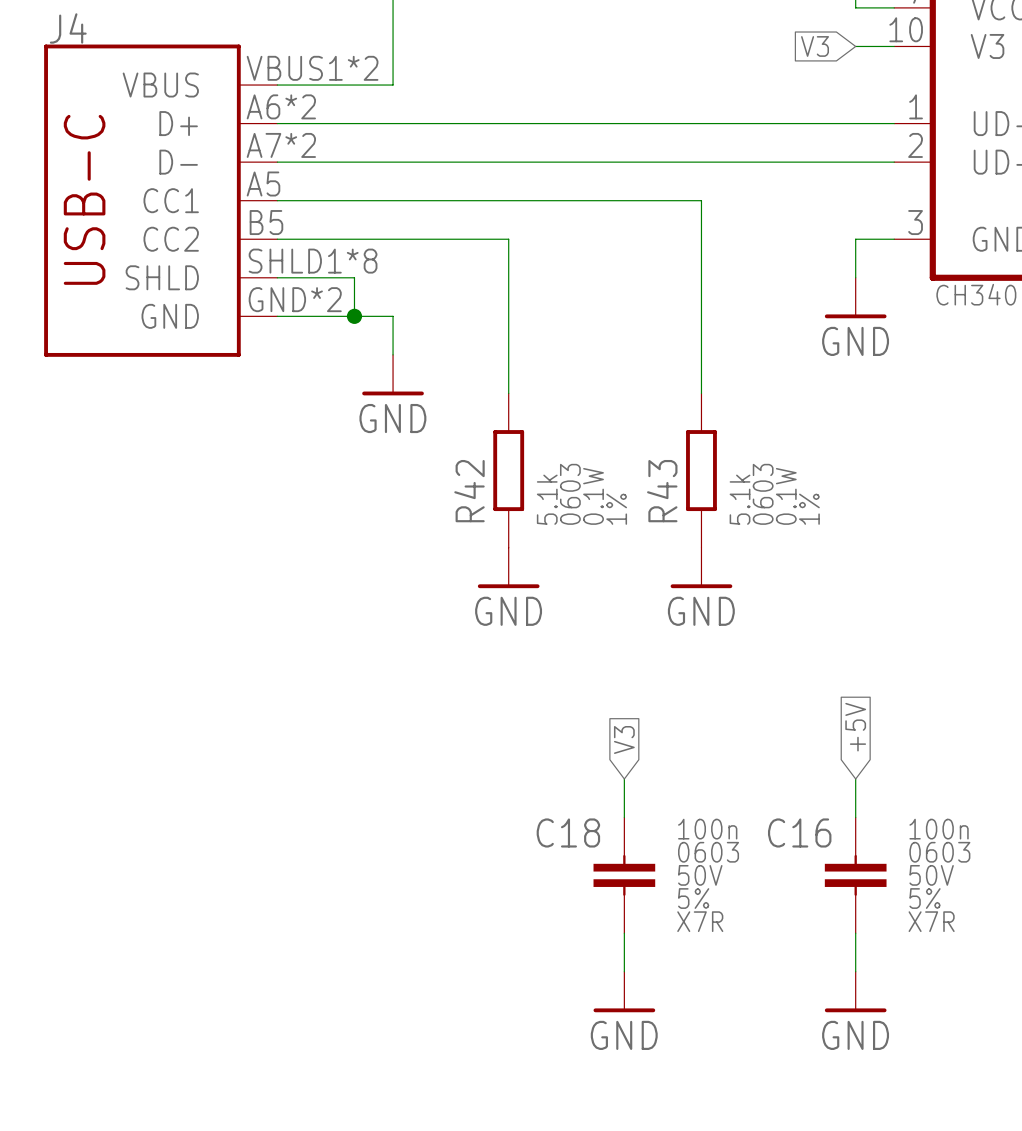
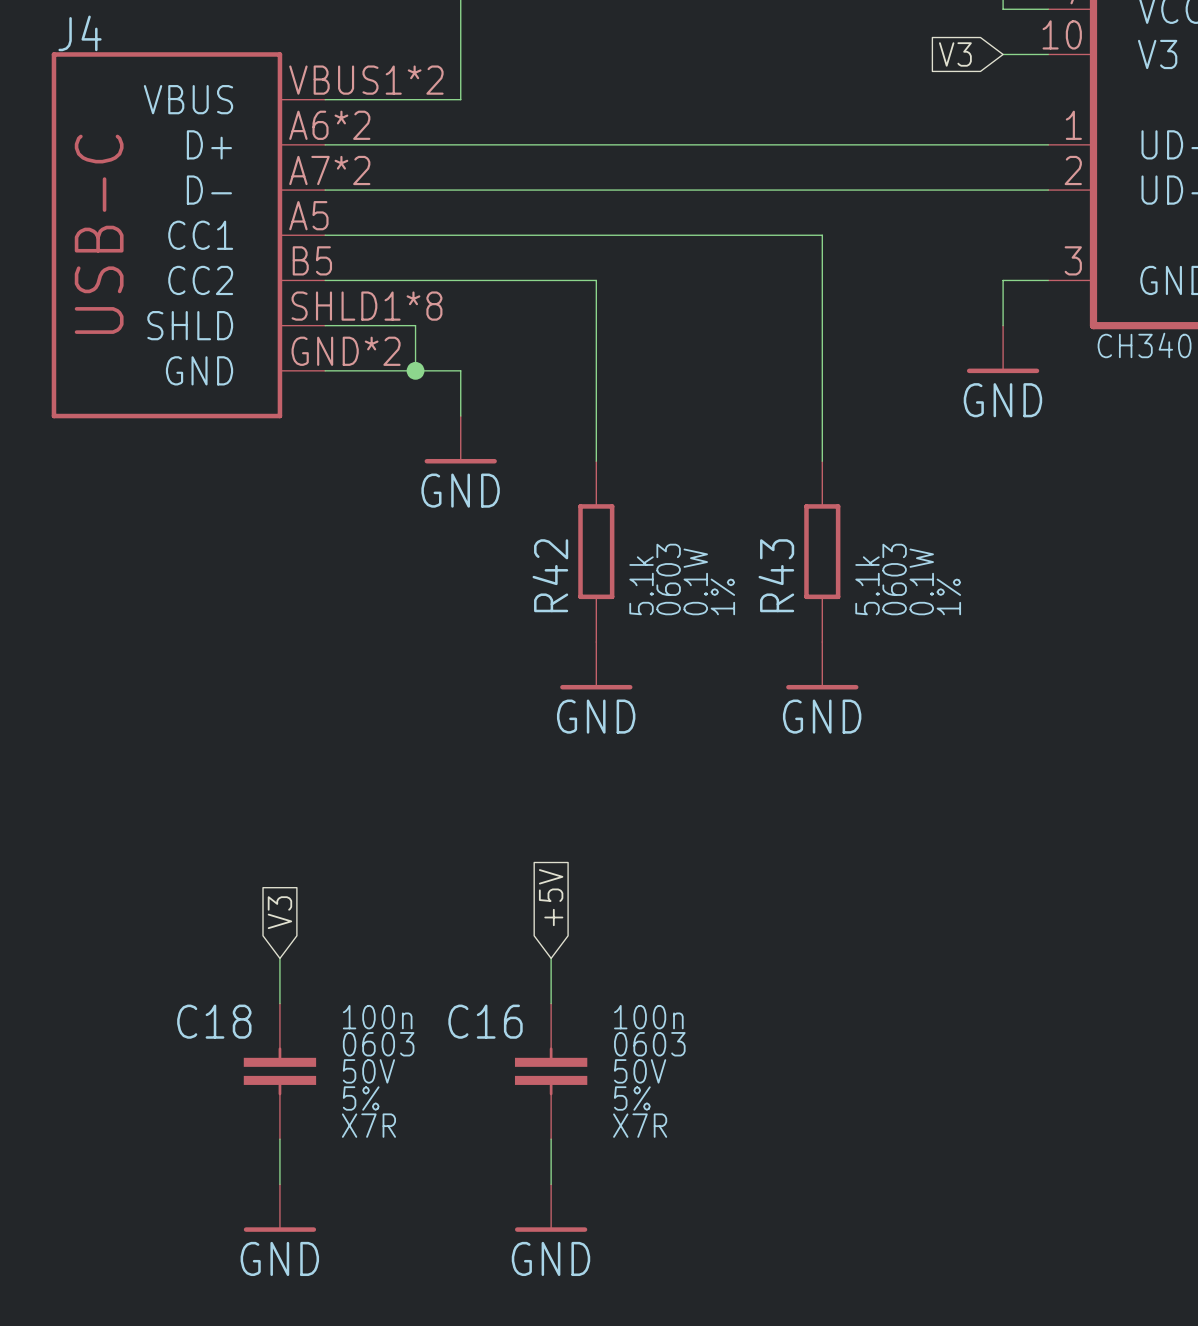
global label: +5V (855, 727) -> none
global label: V3 (624, 739) -> none
global label: none -> +5V (551, 897)
global label: none -> V3 (279, 912)
wire: (624, 779) (624, 817) -> (551, 958) (551, 1003)
wire: (855, 779) (855, 817) -> none
wire: none -> (279, 958) (279, 1003)
C18 position: (624, 875) -> (279, 1071)
C16 position: (855, 875) -> (551, 1071)
wire: (624, 933) (624, 971) -> (551, 1139) (551, 1184)
wire: (855, 933) (855, 971) -> none
wire: none -> (279, 1139) (279, 1184)
power symbol position: GND (624, 992) -> GND (551, 1208)
power symbol: GND (855, 992) -> none
power symbol: none -> GND (279, 1208)

